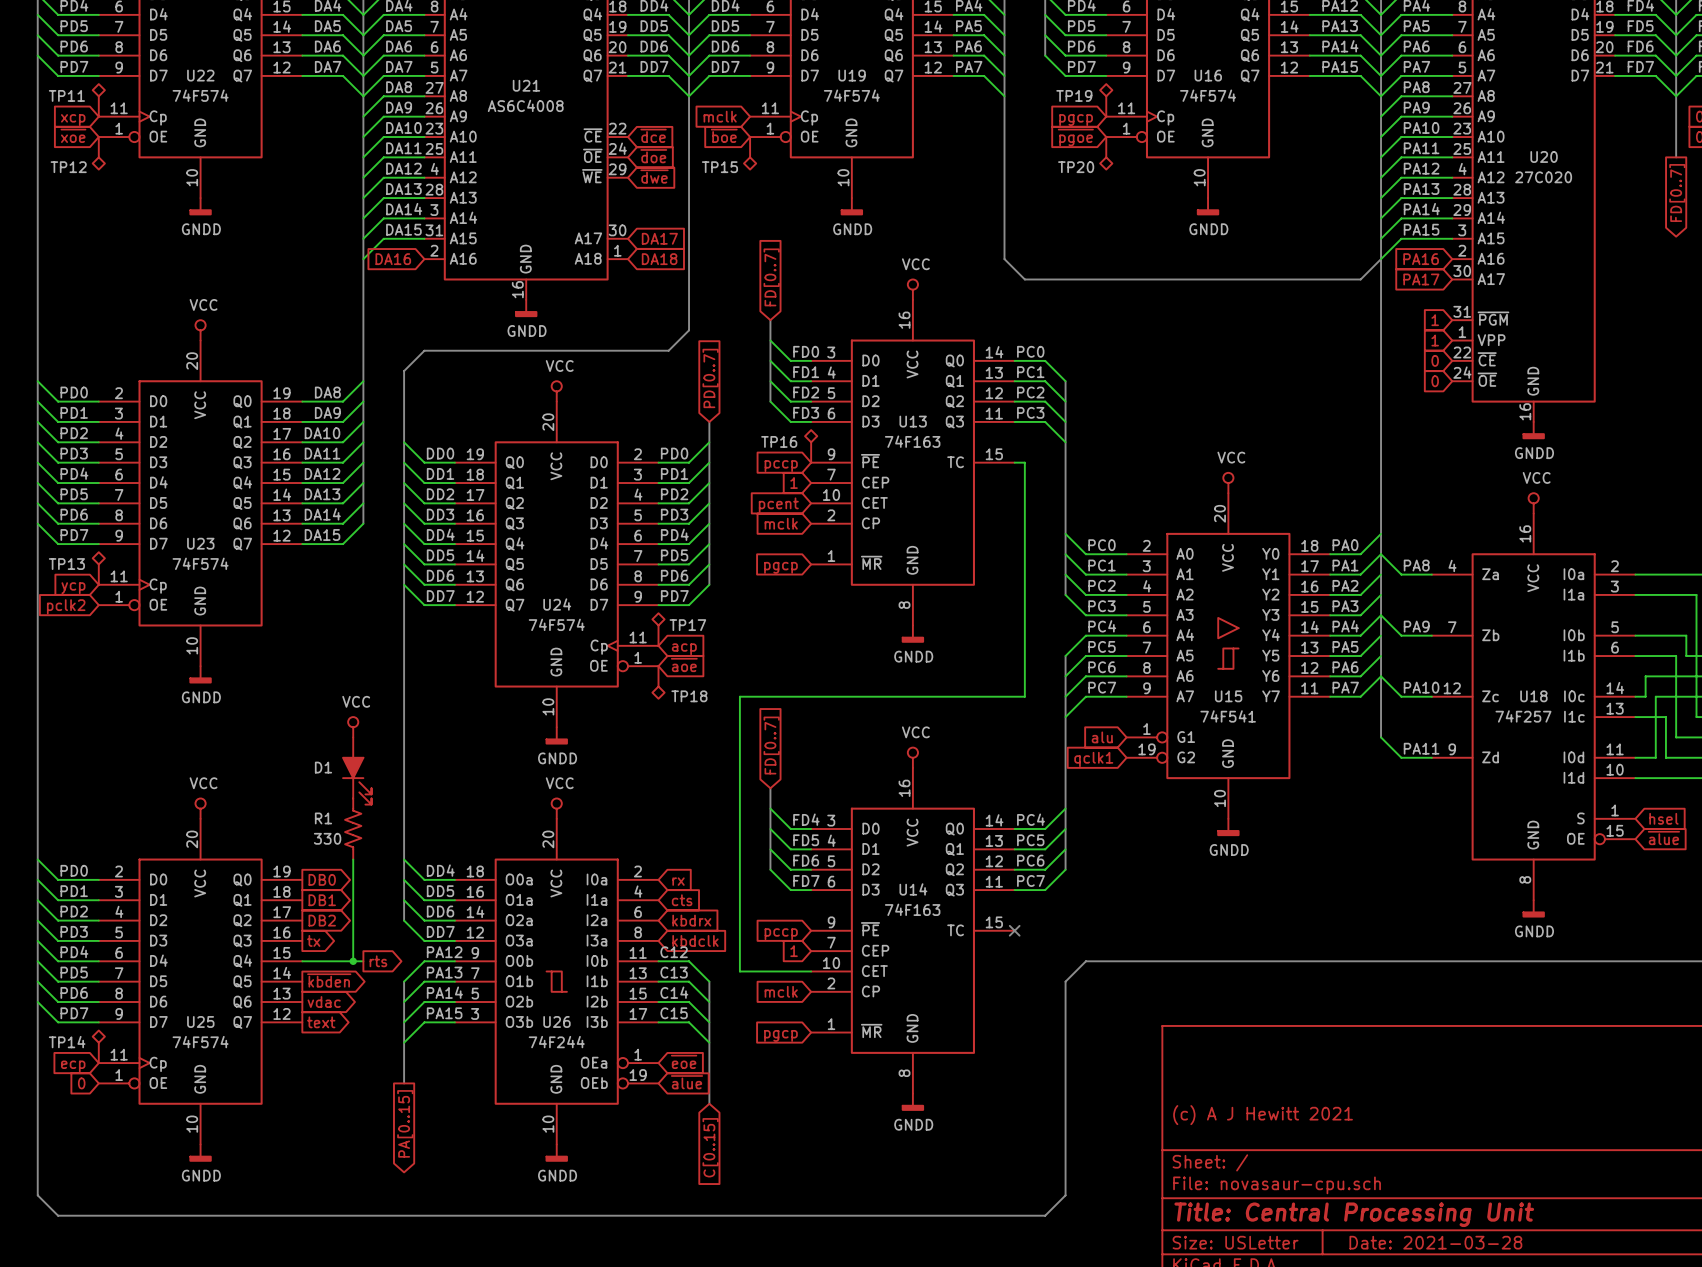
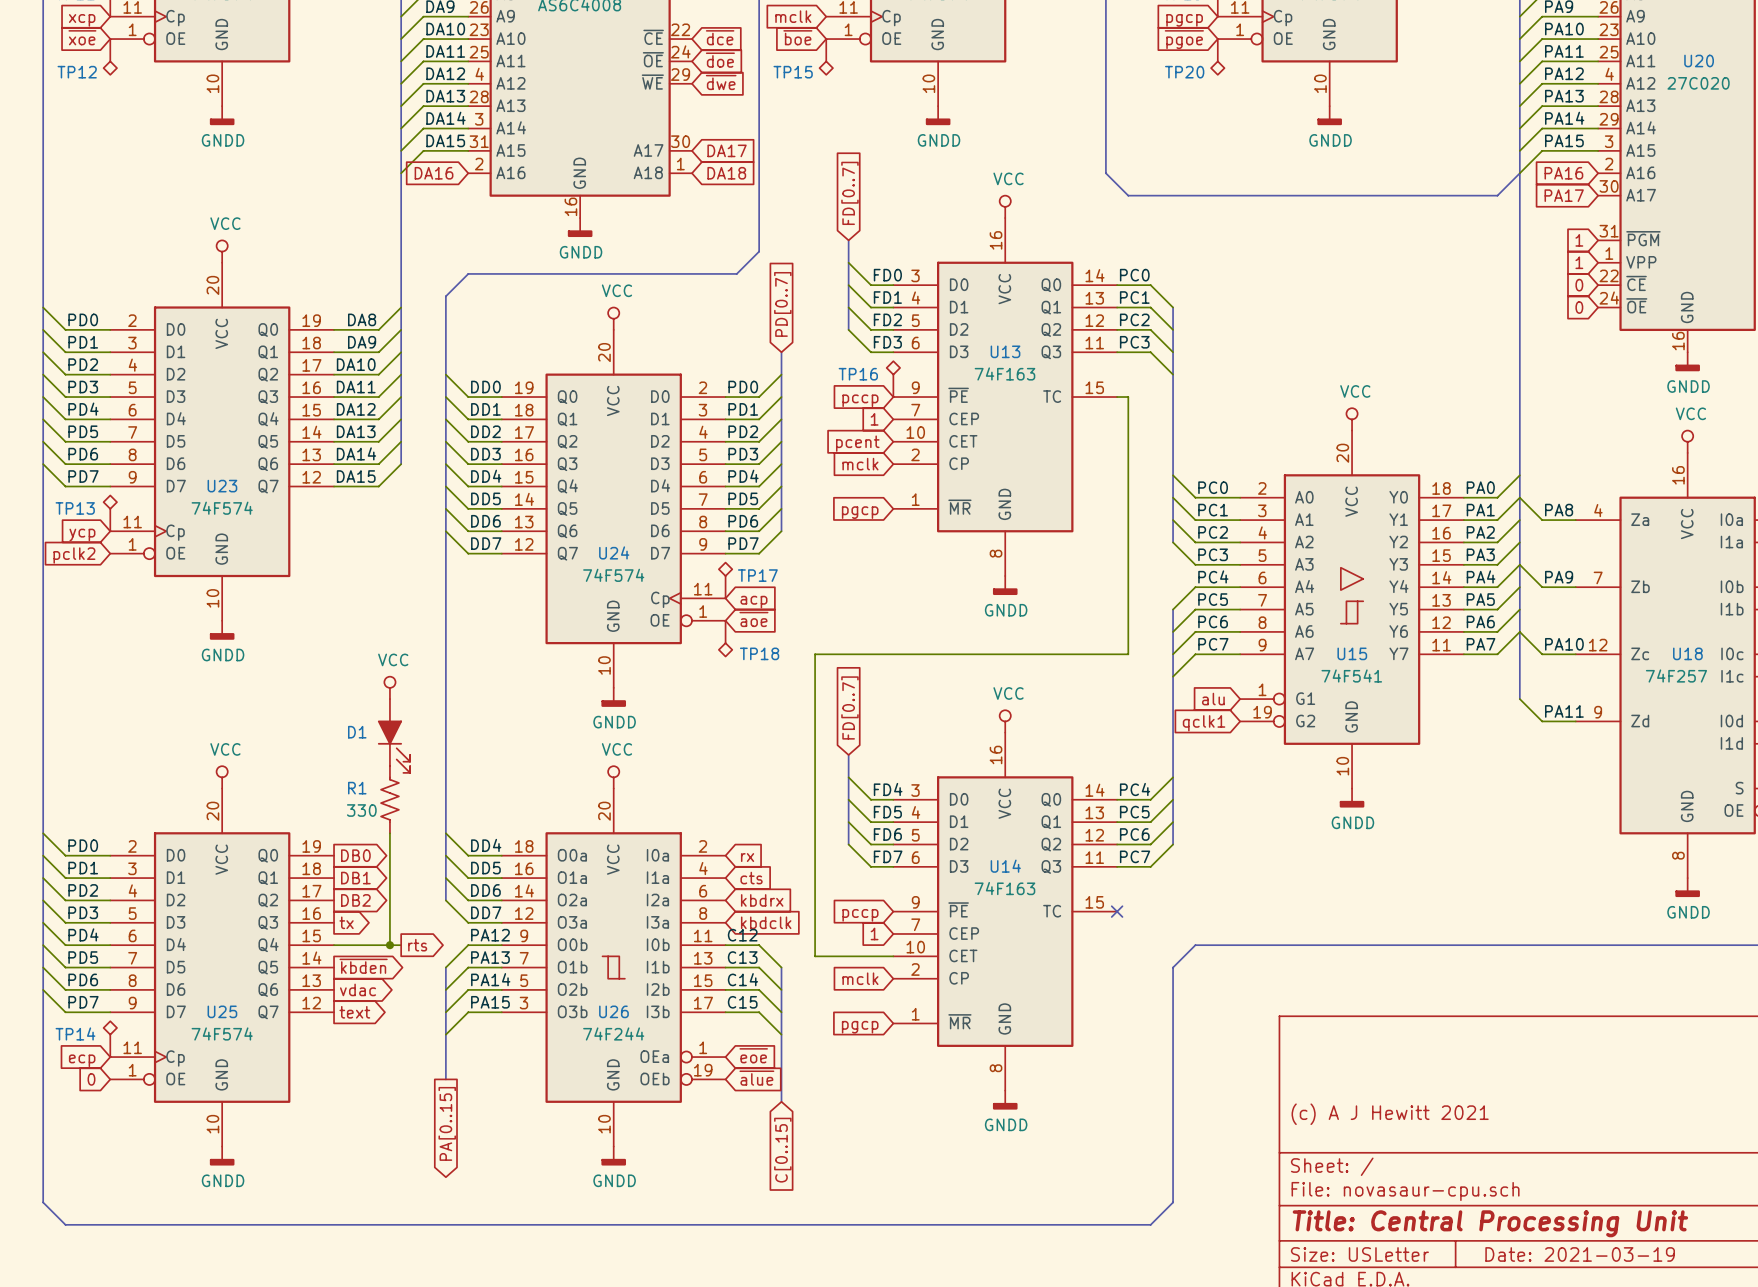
title block: Date: 2021-03-28 (1435, 1242) -> Date: 2021-03-19 (1580, 1254)

